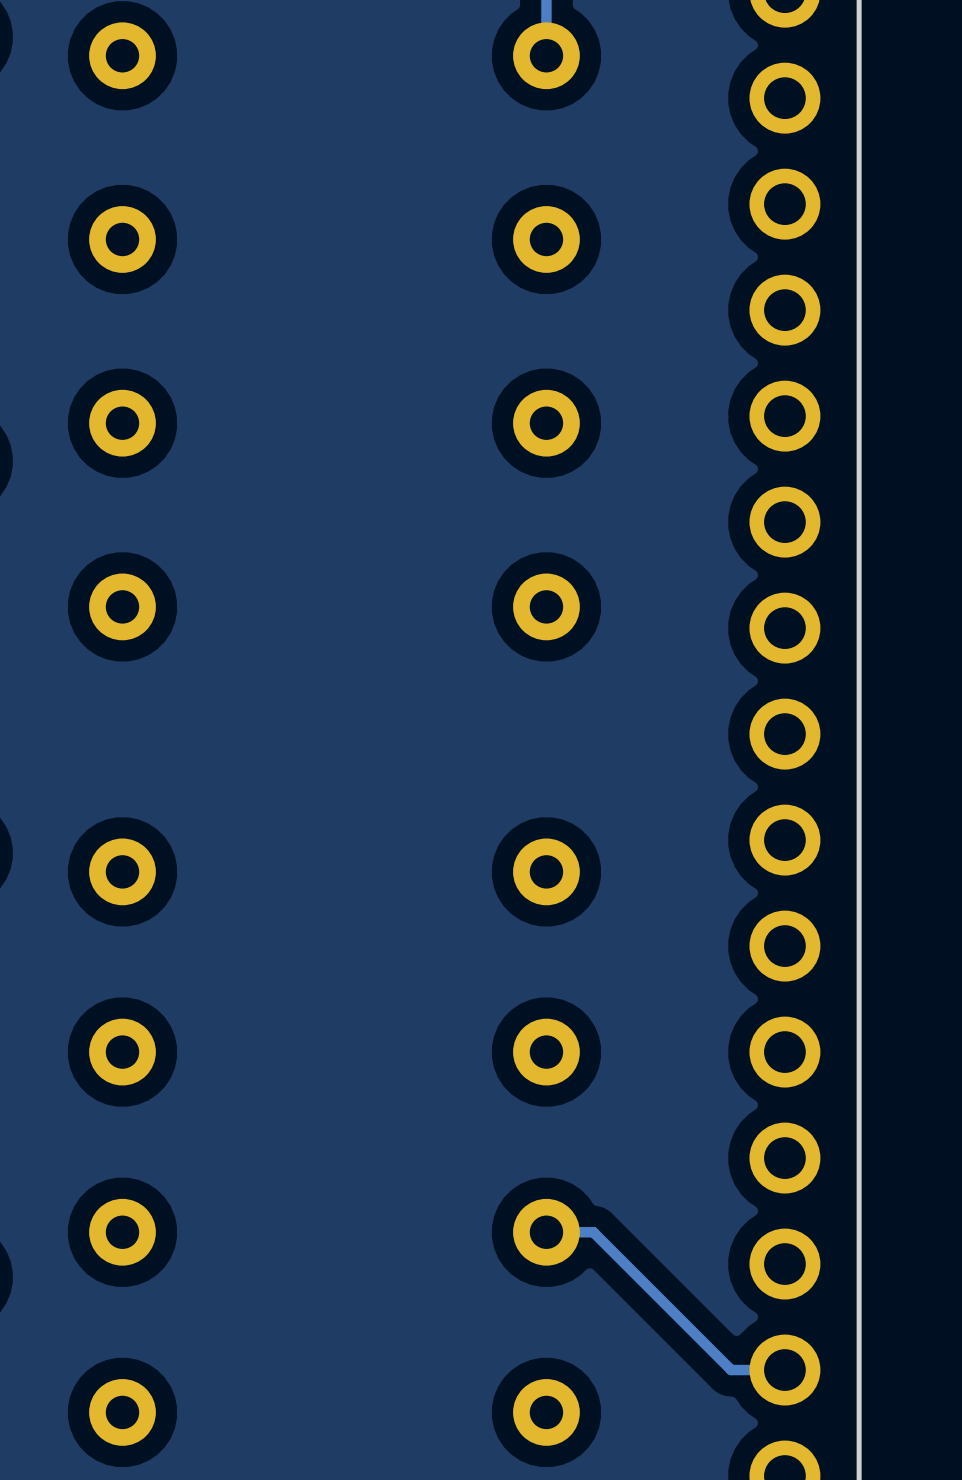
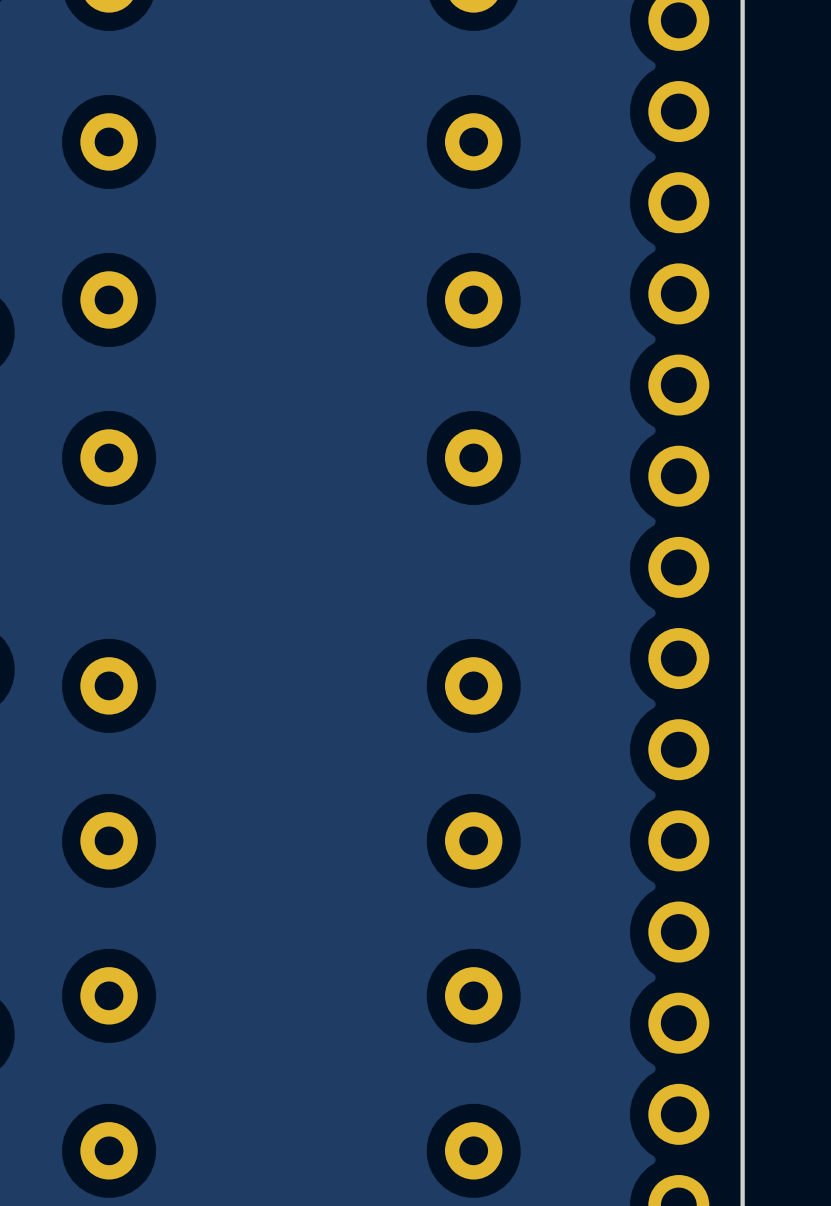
track: (546, 1232) (593, 1232) (731, 1370) (784, 1370) -> none

